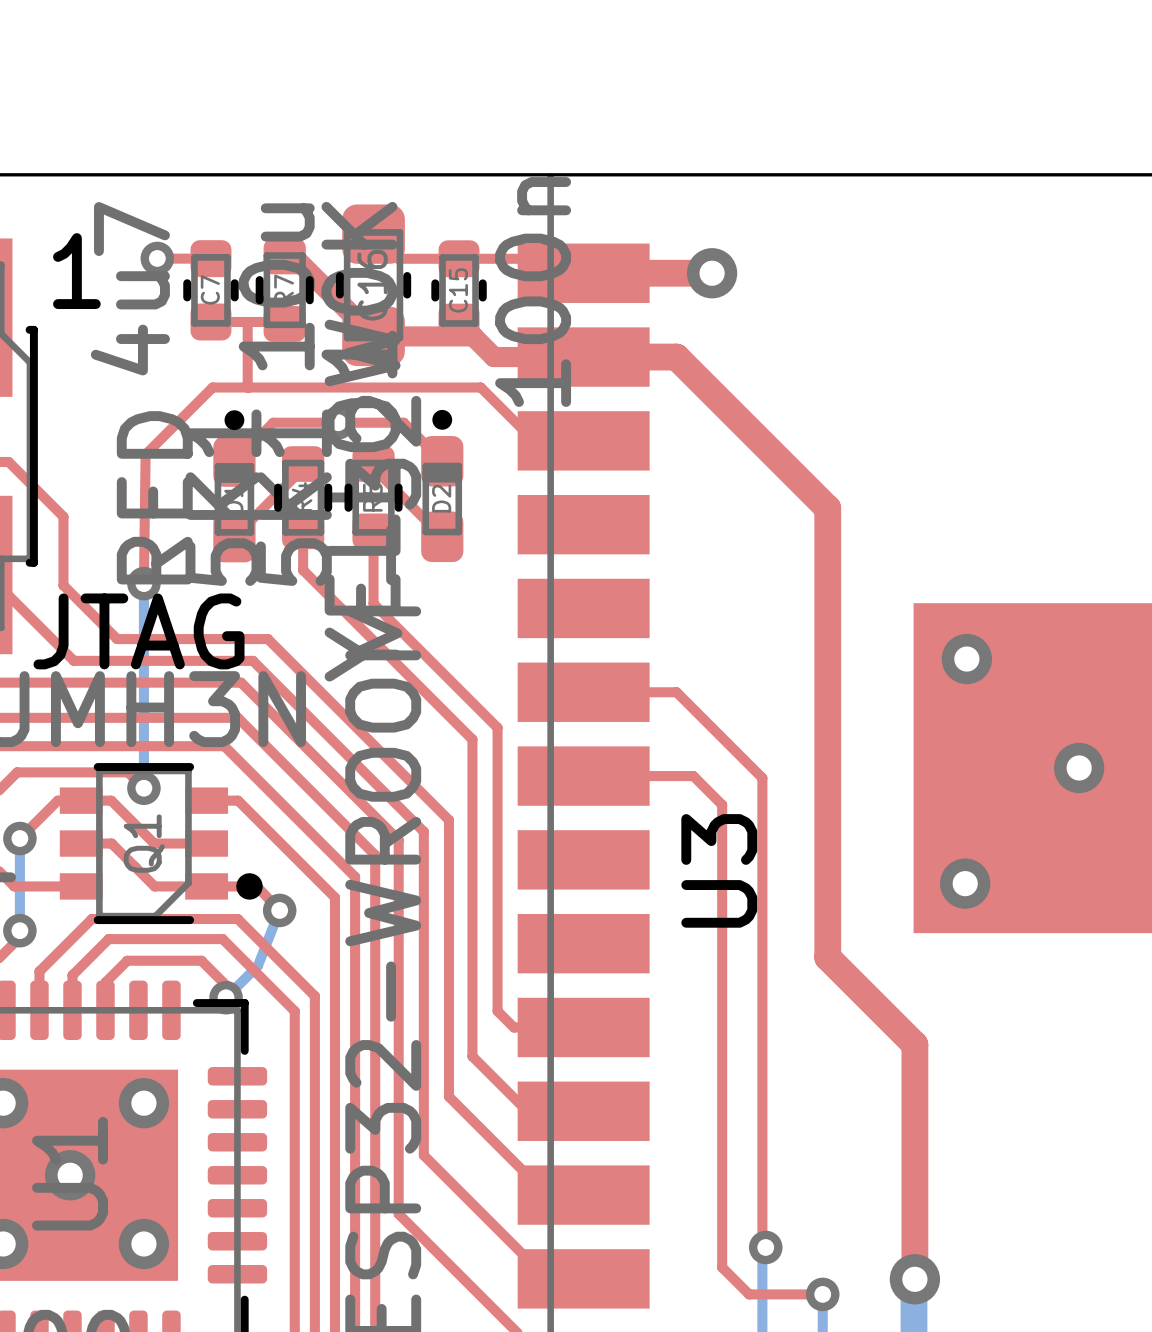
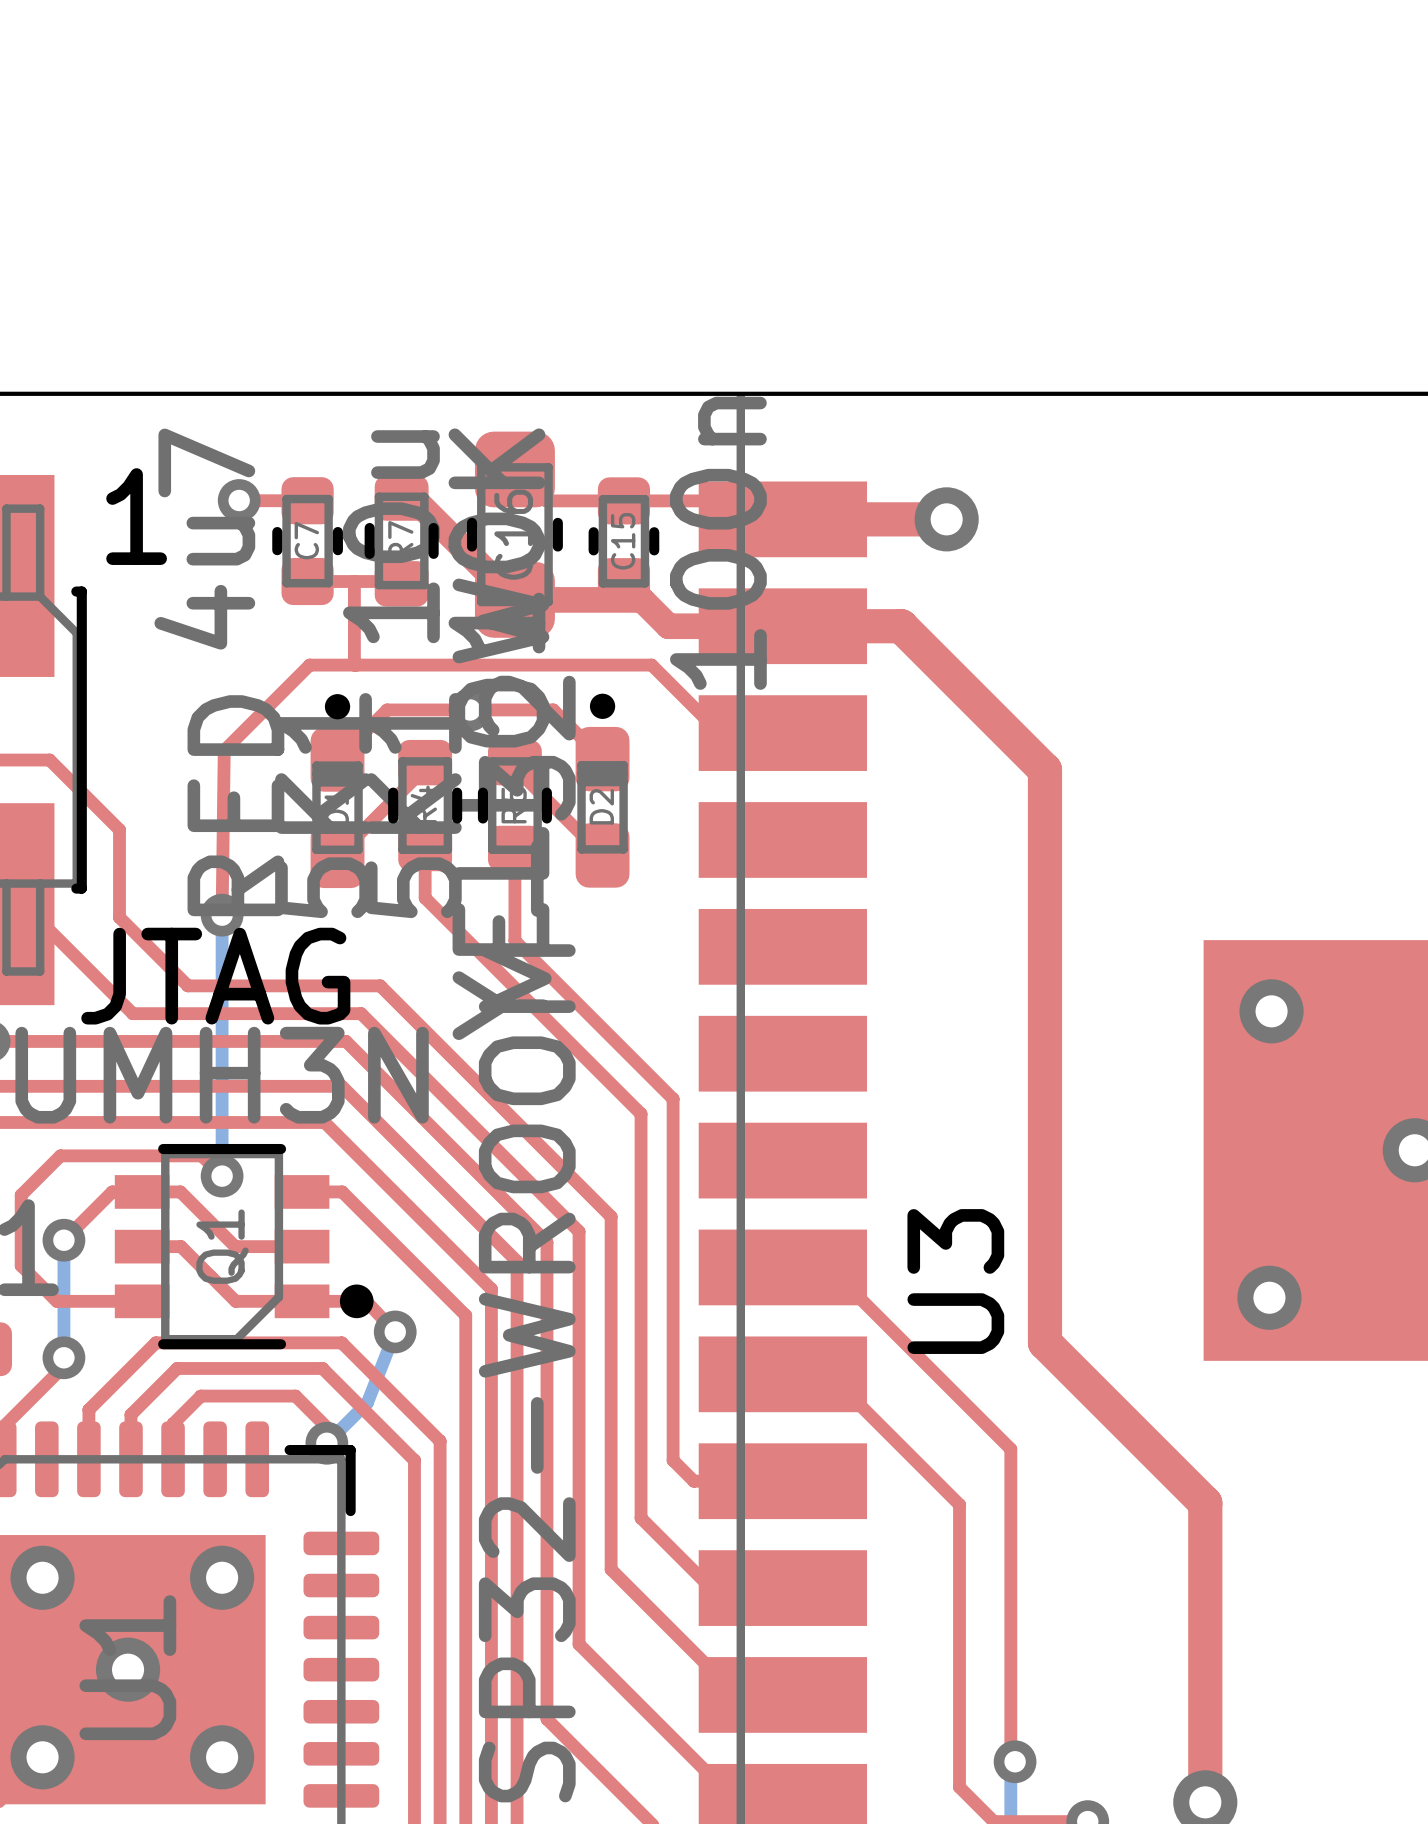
top track: (789, 469) (827, 508) (827, 957) -> (1044, 770) (1044, 1342) (1094, 1391)
top track: (583, 692) (676, 692) (762, 778) (762, 1002) -> (782, 1267) (829, 1267) (1010, 1449)
top track: (583, 776) (693, 776) (722, 804) (722, 1045) -> (782, 1374) (829, 1374) (959, 1504)

